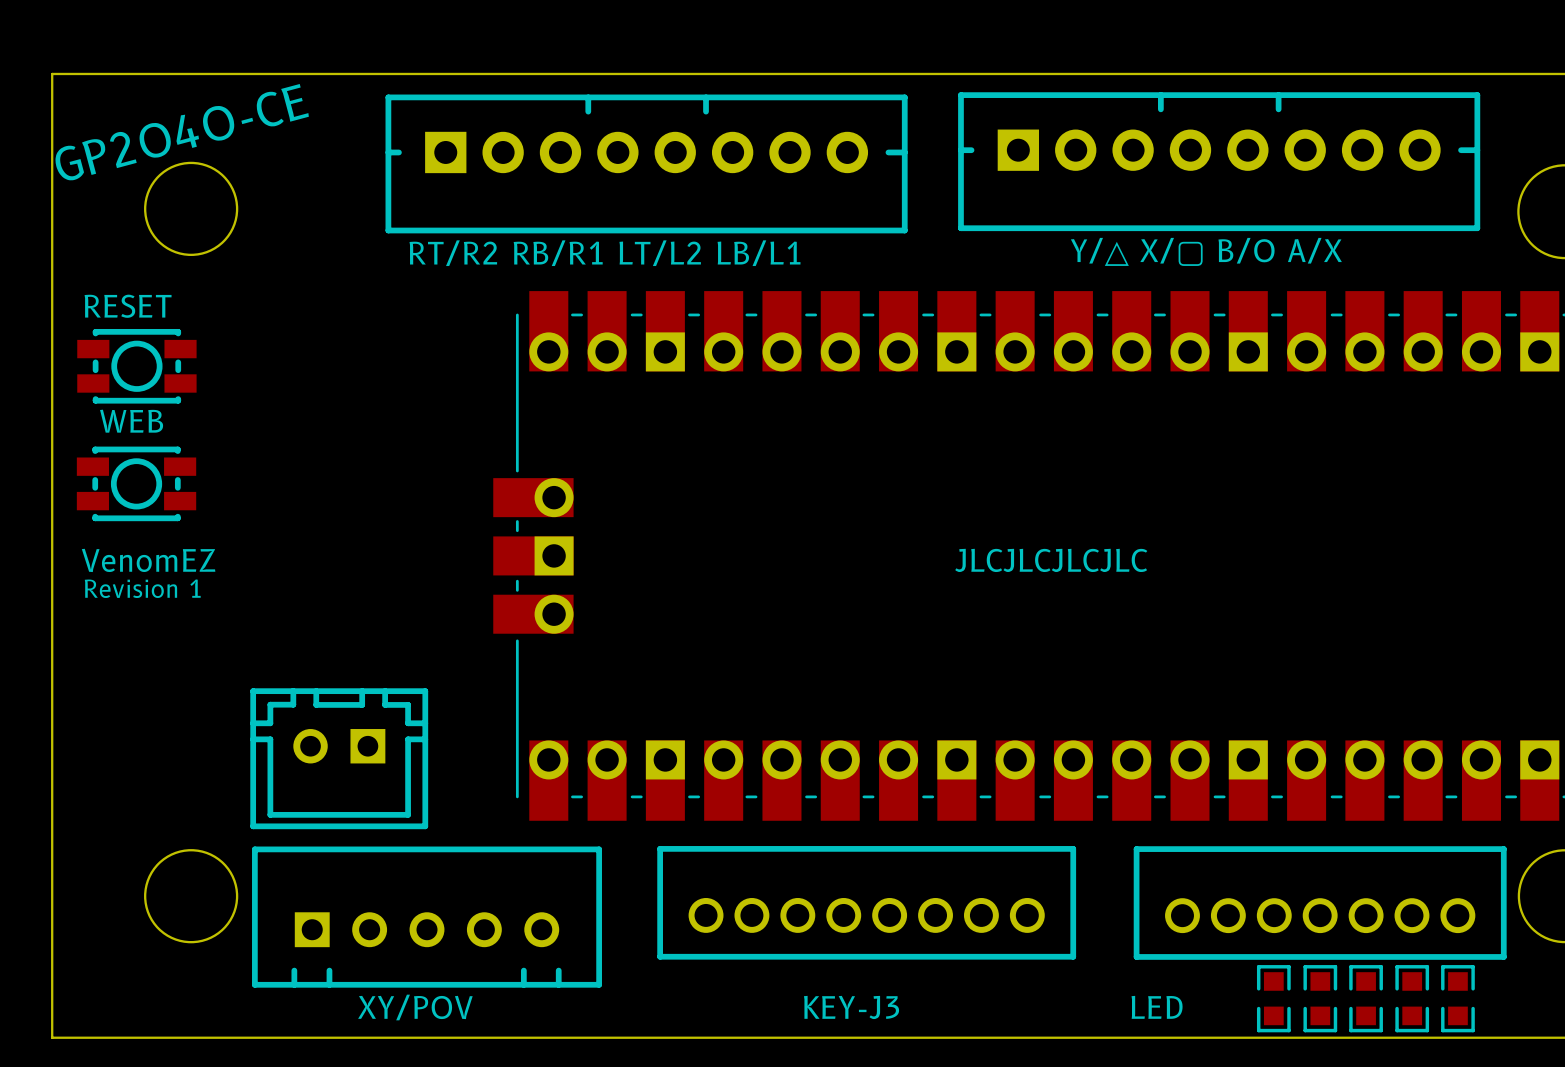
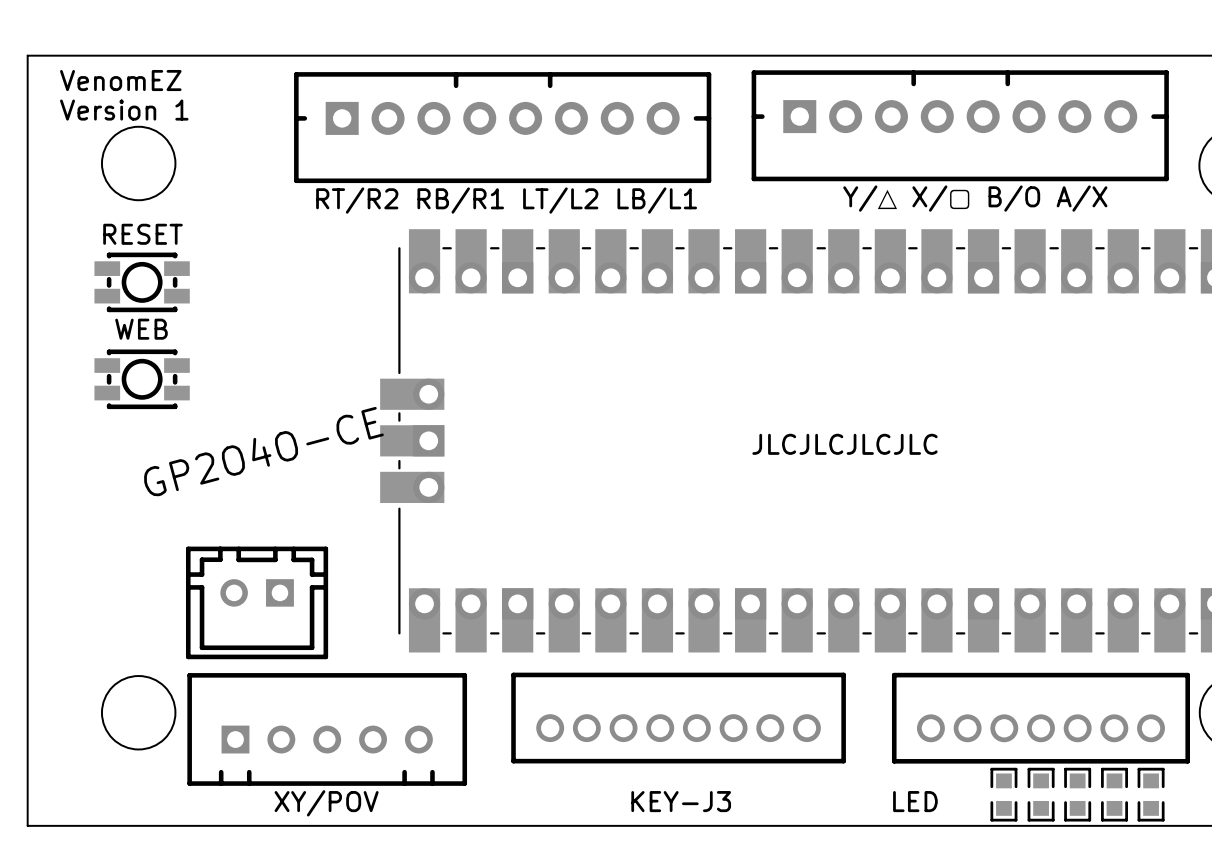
text position: GP2O4O-CE (182, 132) -> GP2O4O-CE (263, 451)
text: none -> Version 1 (124, 110)
text position: RESET (128, 306) -> RESET (143, 234)
part position: (136, 366) -> (142, 282)
text position: WEB (131, 421) -> WEB (141, 329)
part position: (136, 483) -> (142, 379)
text position: VenomEZ (148, 560) -> VenomEZ (120, 80)
text: Revision 1 (142, 588) -> none

